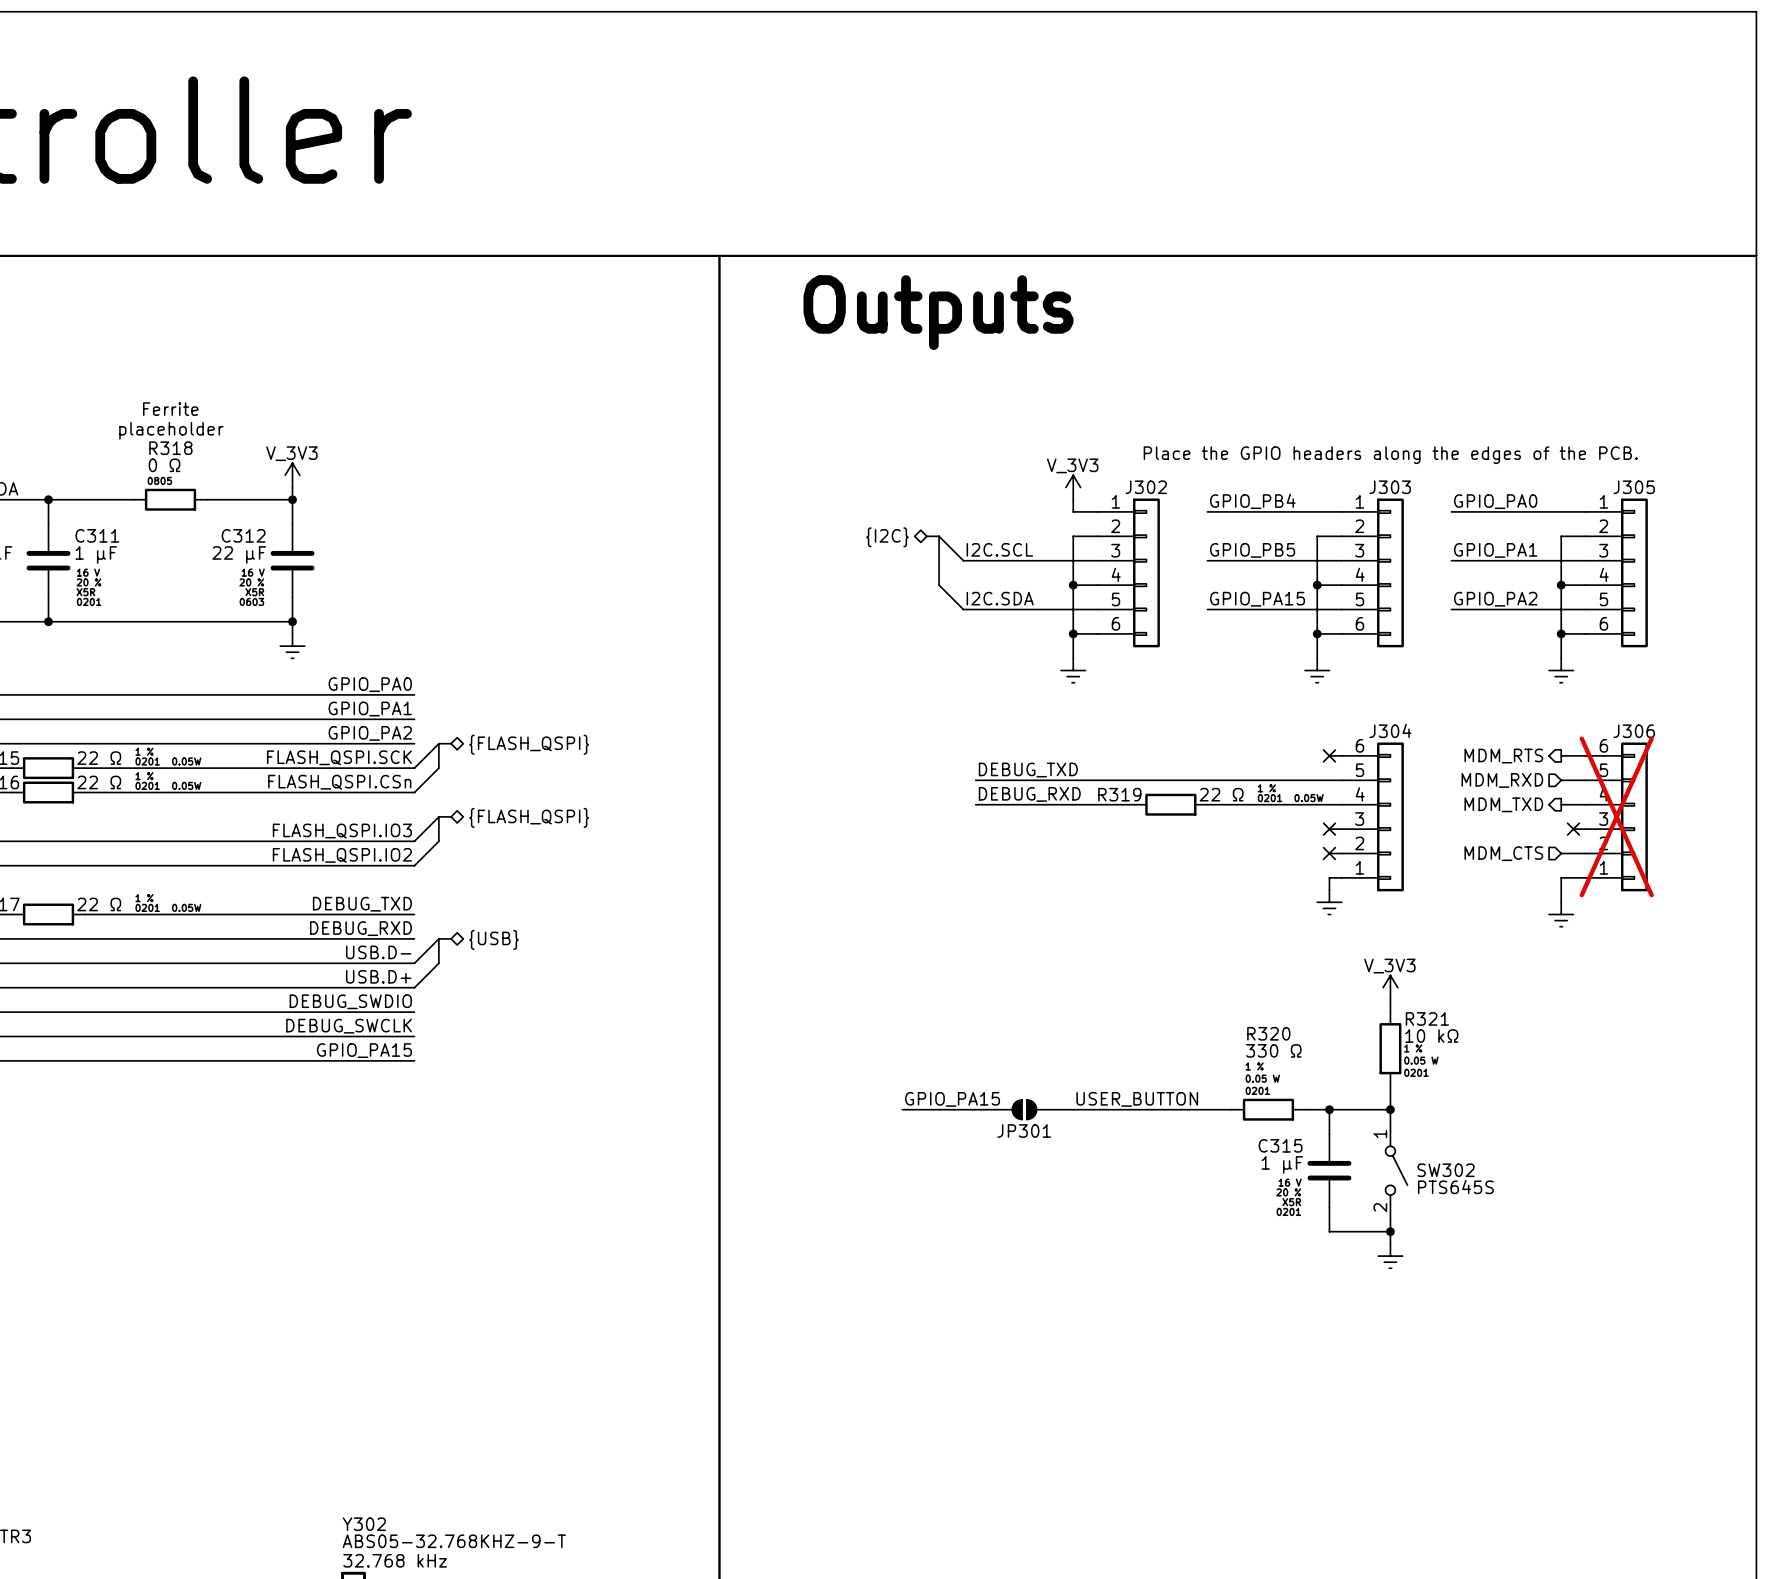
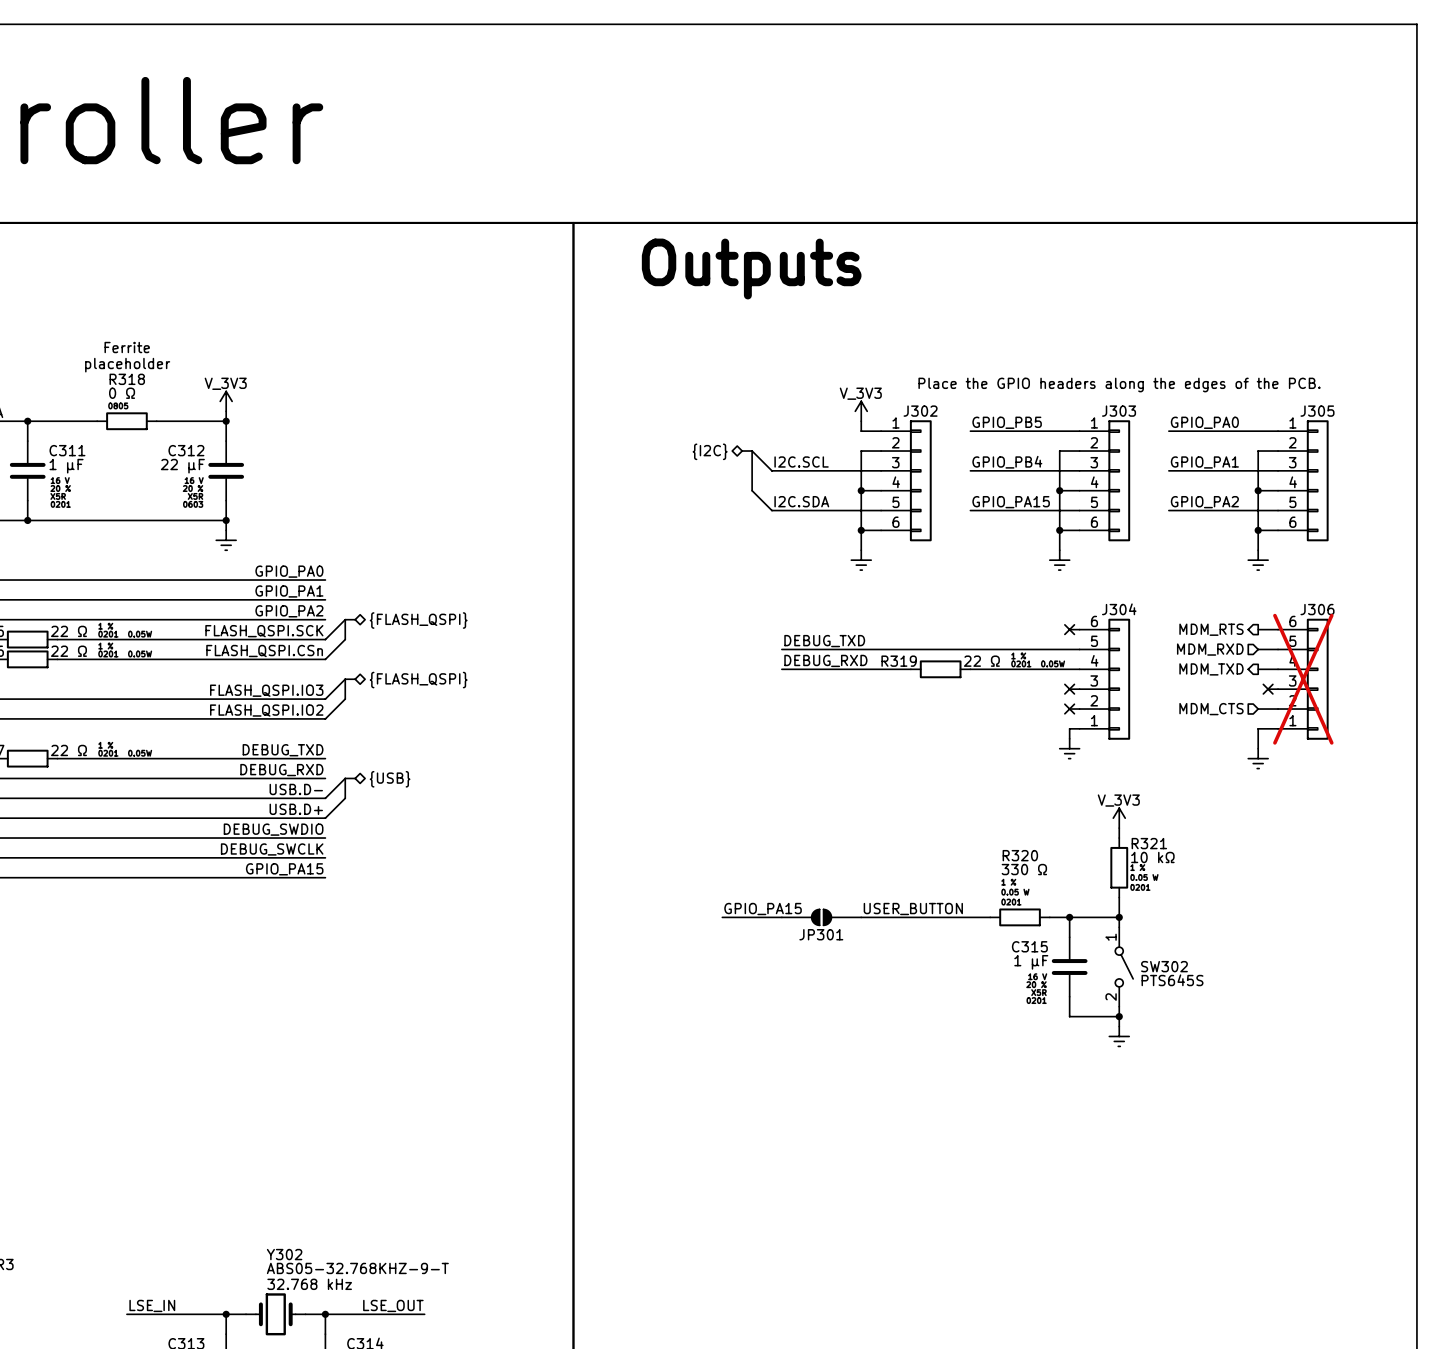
label: GPIO_PB4 (1252, 501) -> GPIO_PB5 (1007, 422)
label: GPIO_PB5 (1252, 550) -> GPIO_PB4 (1007, 462)

